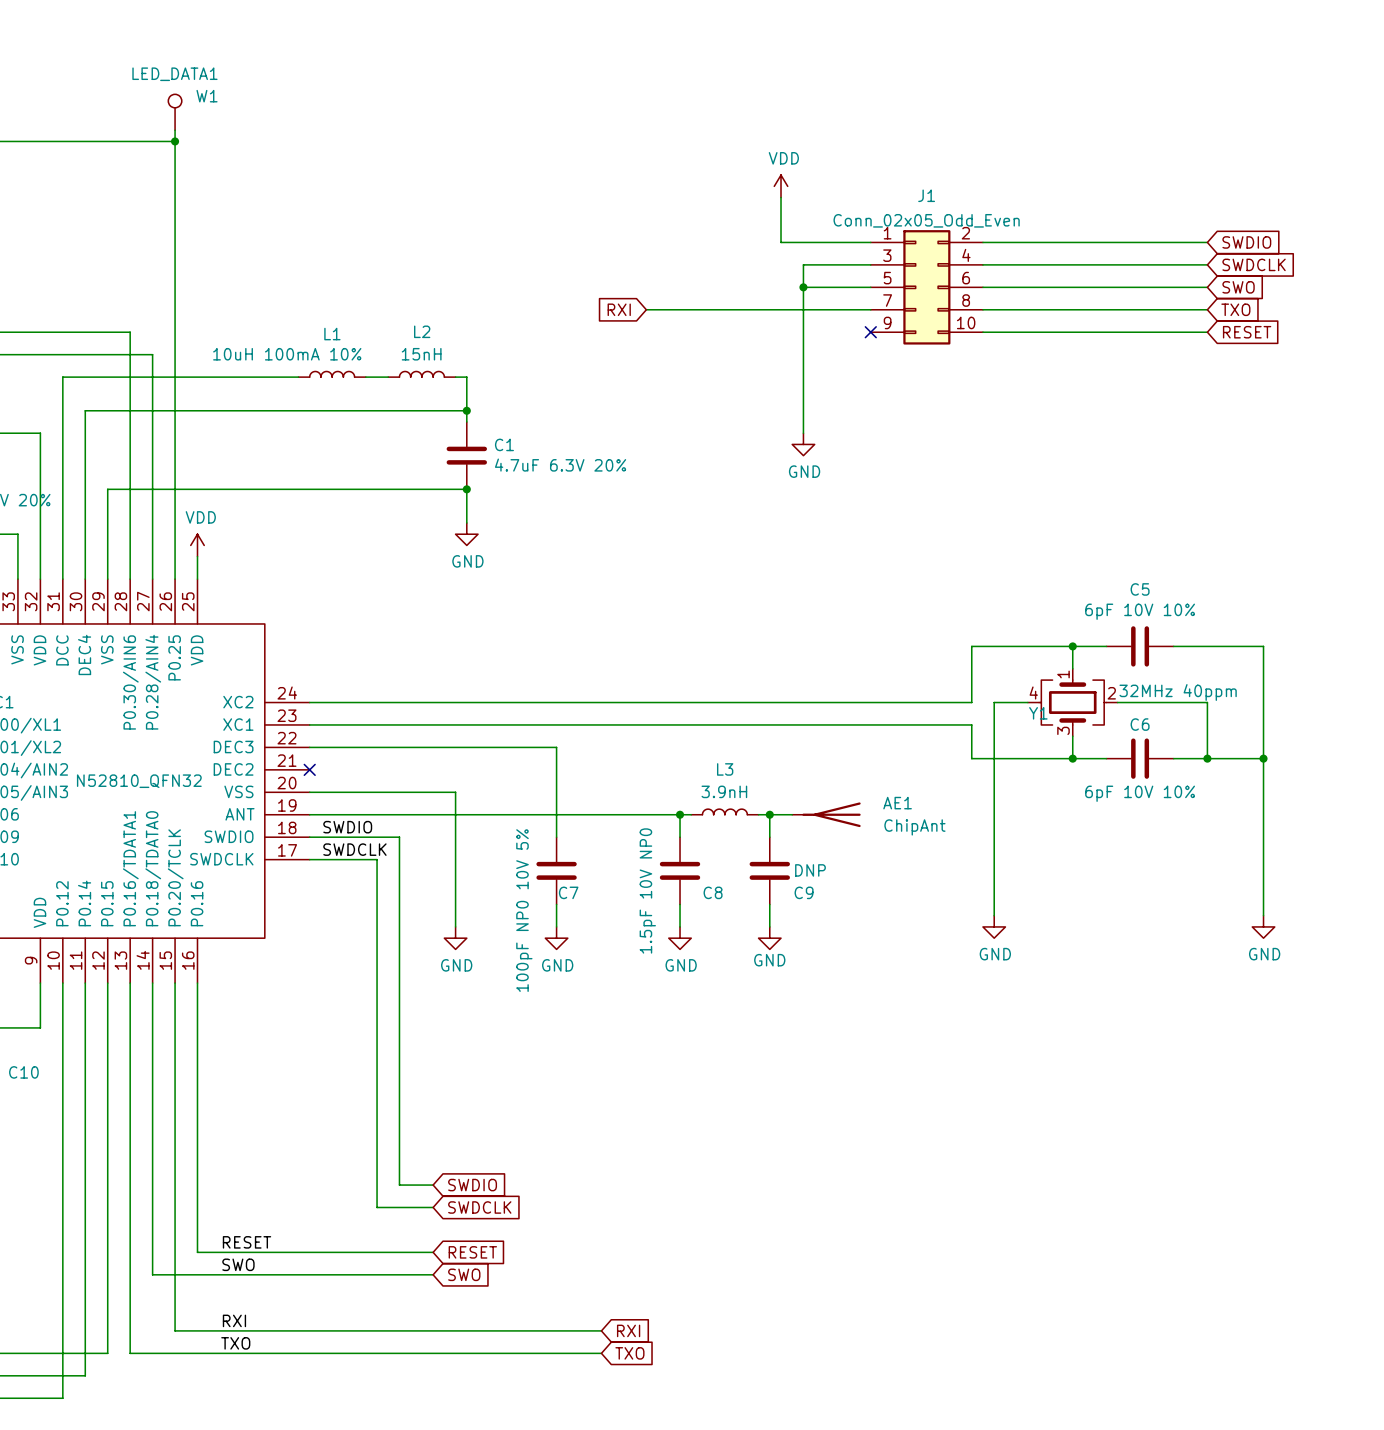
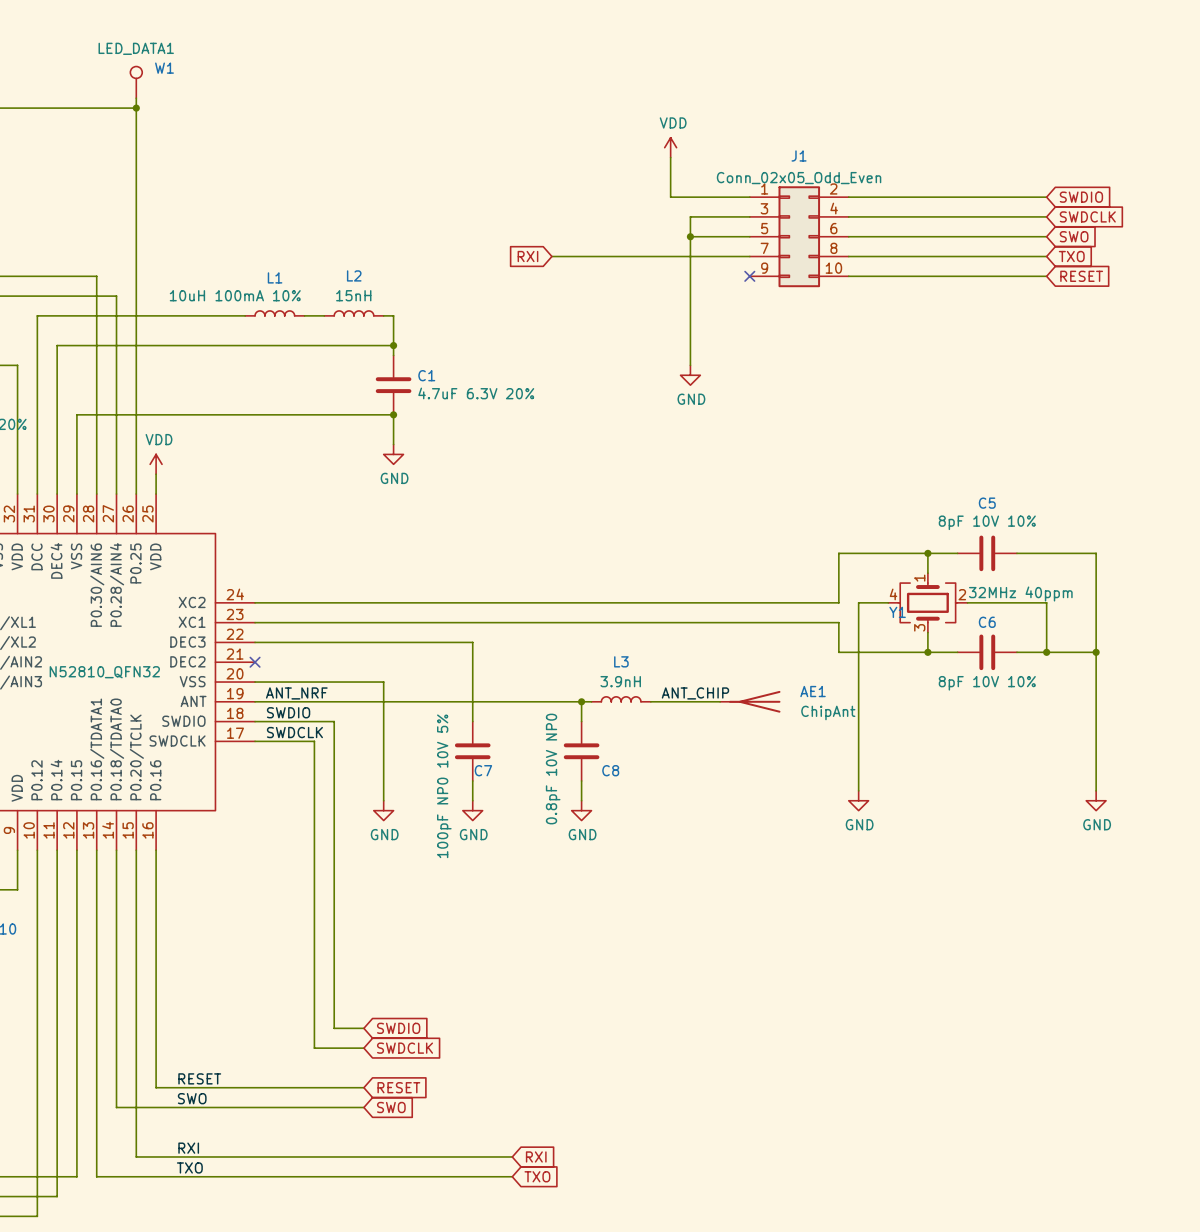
C5 value: 6pF 10V 10% (1140, 611) -> 8pF 10V 10% (987, 522)
C6 value: 6pF 10V 10% (1140, 793) -> 8pF 10V 10% (987, 683)
label: none -> ANT_NRF (296, 693)
label: none -> ANT_CHIP (695, 693)
wire: (769, 814) (769, 837) -> none
junction: (769, 814) -> none
AE1 position: (826, 814) -> (750, 701)
C9: DNP (769, 870) -> none
C8 value: 1.5pF 10V NP0 (647, 890) -> 0.8pF 10V NP0 (553, 769)
wire: (769, 904) (769, 926) -> none
power symbol: GND (769, 938) -> none

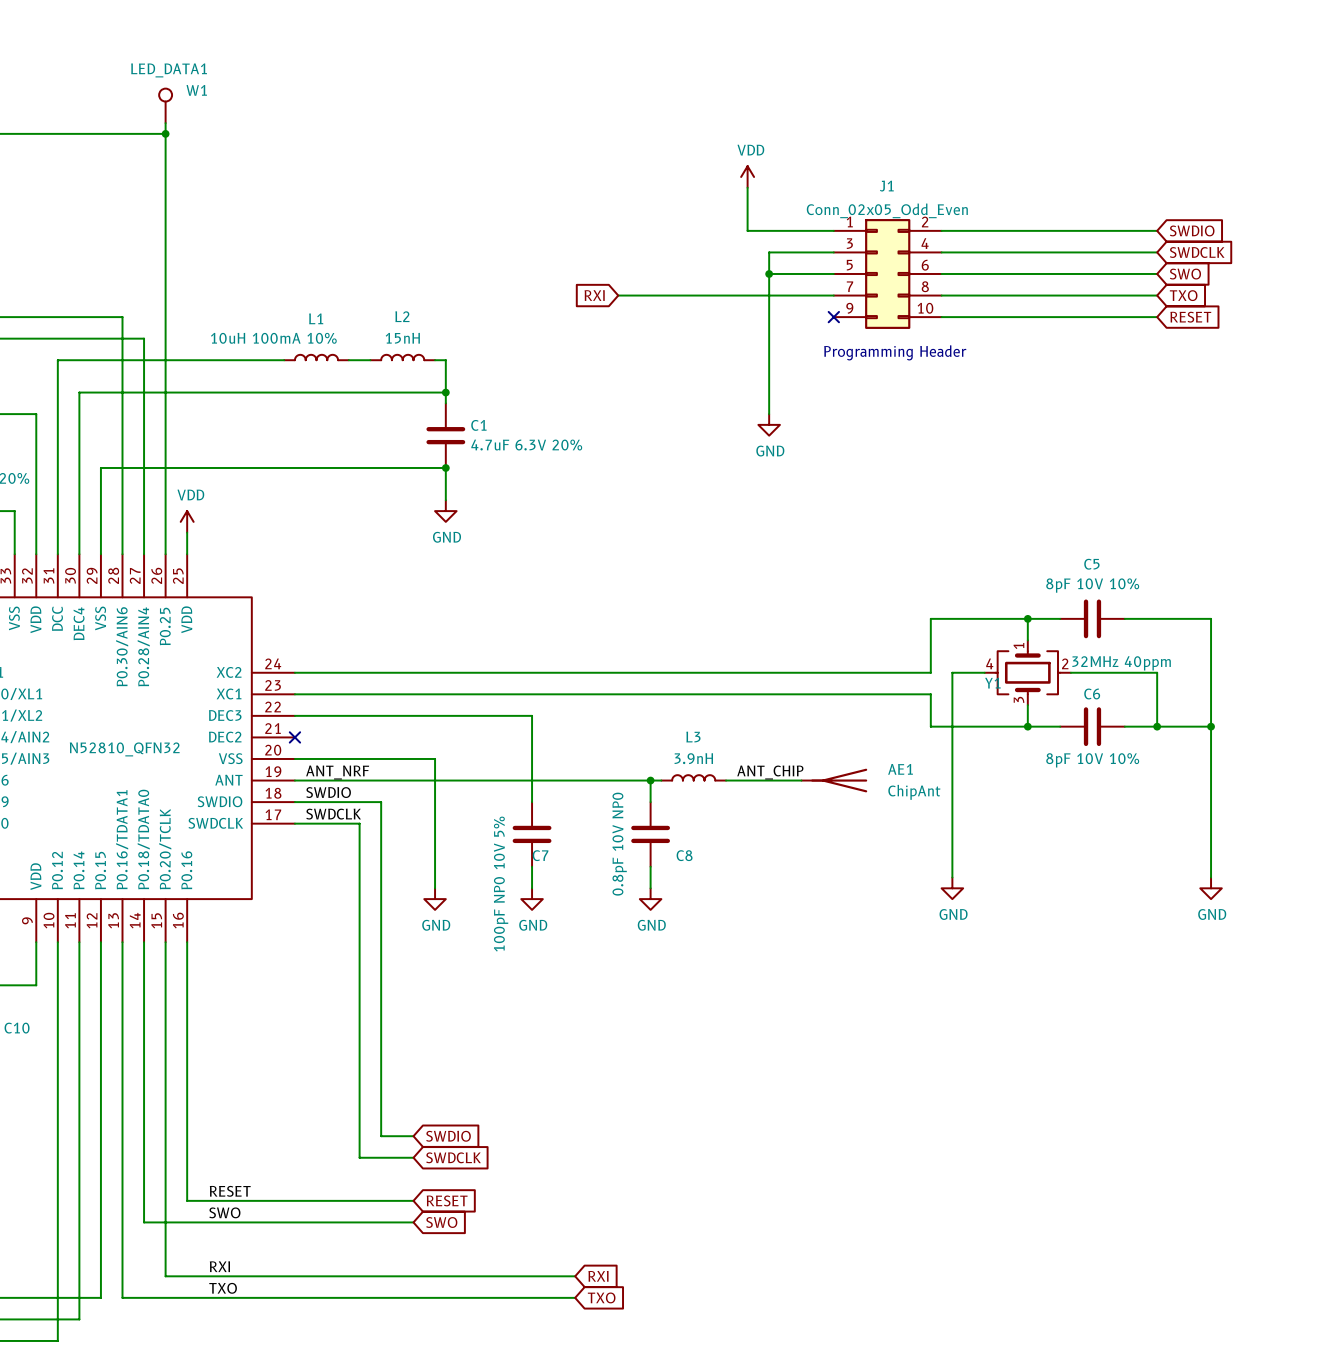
text: none -> Programming Header (895, 352)

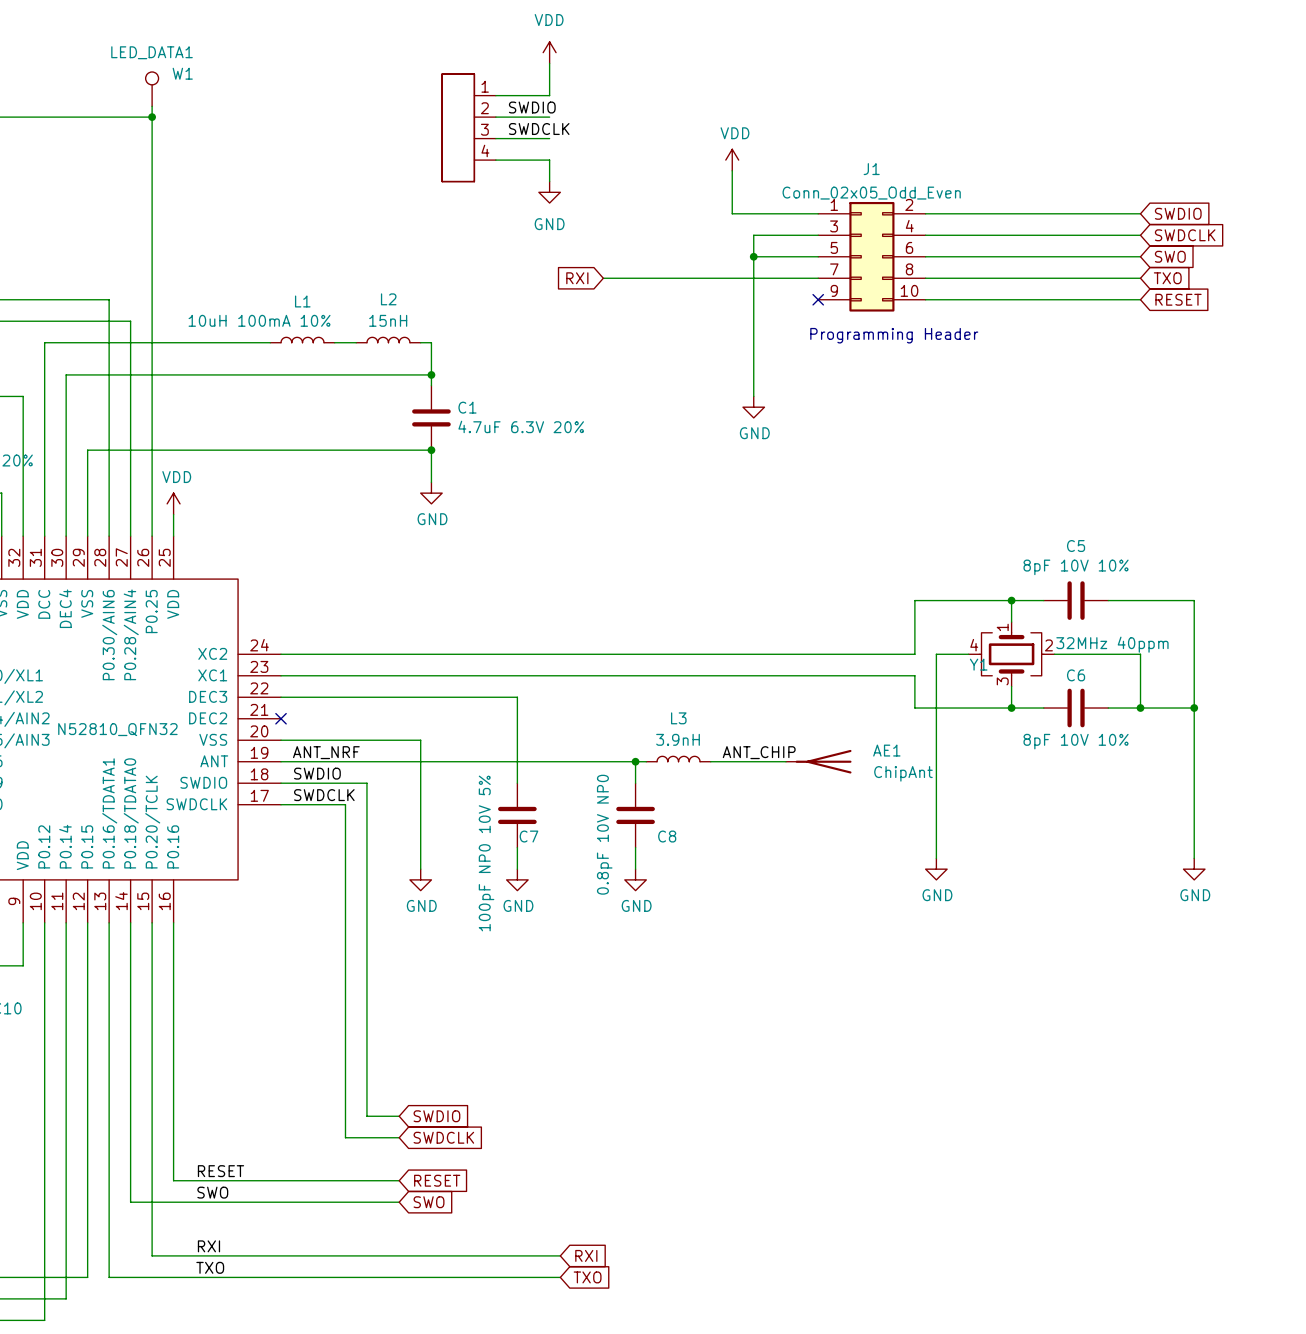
power symbol: none -> VDD (549, 52)
wire: none -> (549, 63) (549, 95) (495, 95)
label: none -> SWDIO (532, 107)
wire: none -> (495, 117) (549, 117)
part: none -> (469, 127)
label: none -> SWDCLK (539, 129)
wire: none -> (495, 138) (549, 138)
wire: none -> (495, 160) (549, 160) (549, 181)
power symbol: none -> GND (549, 192)

